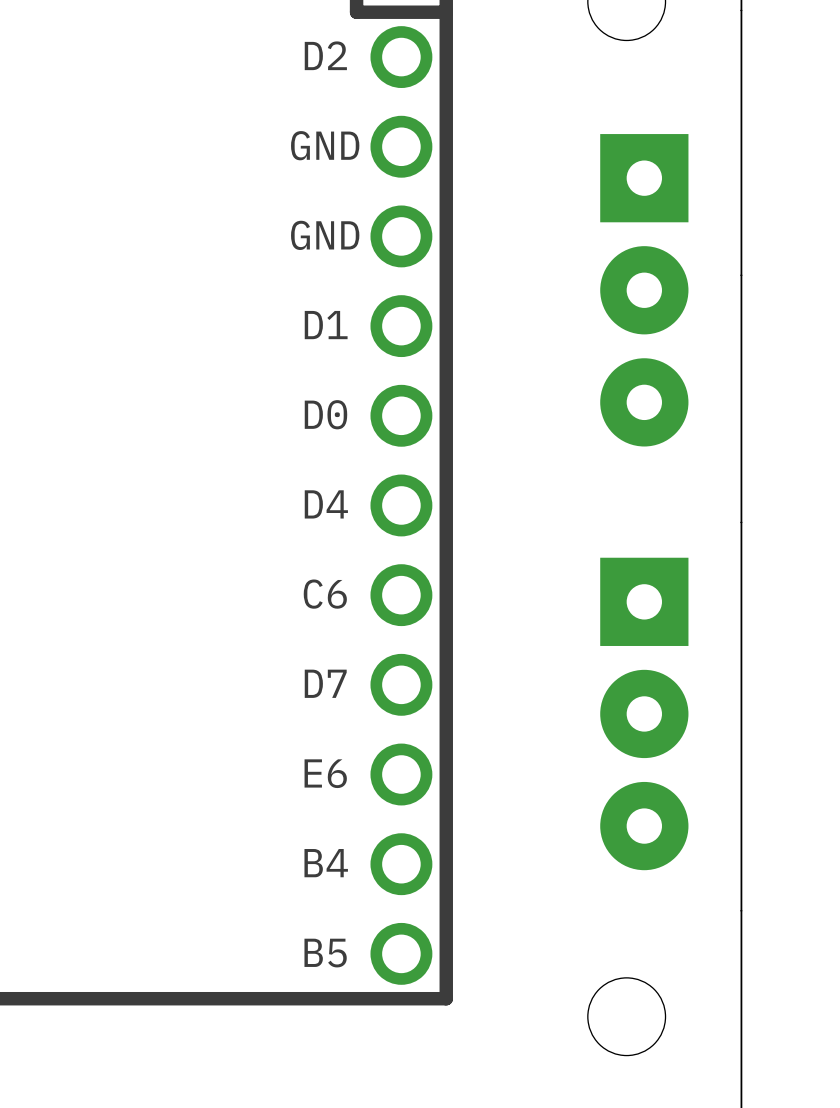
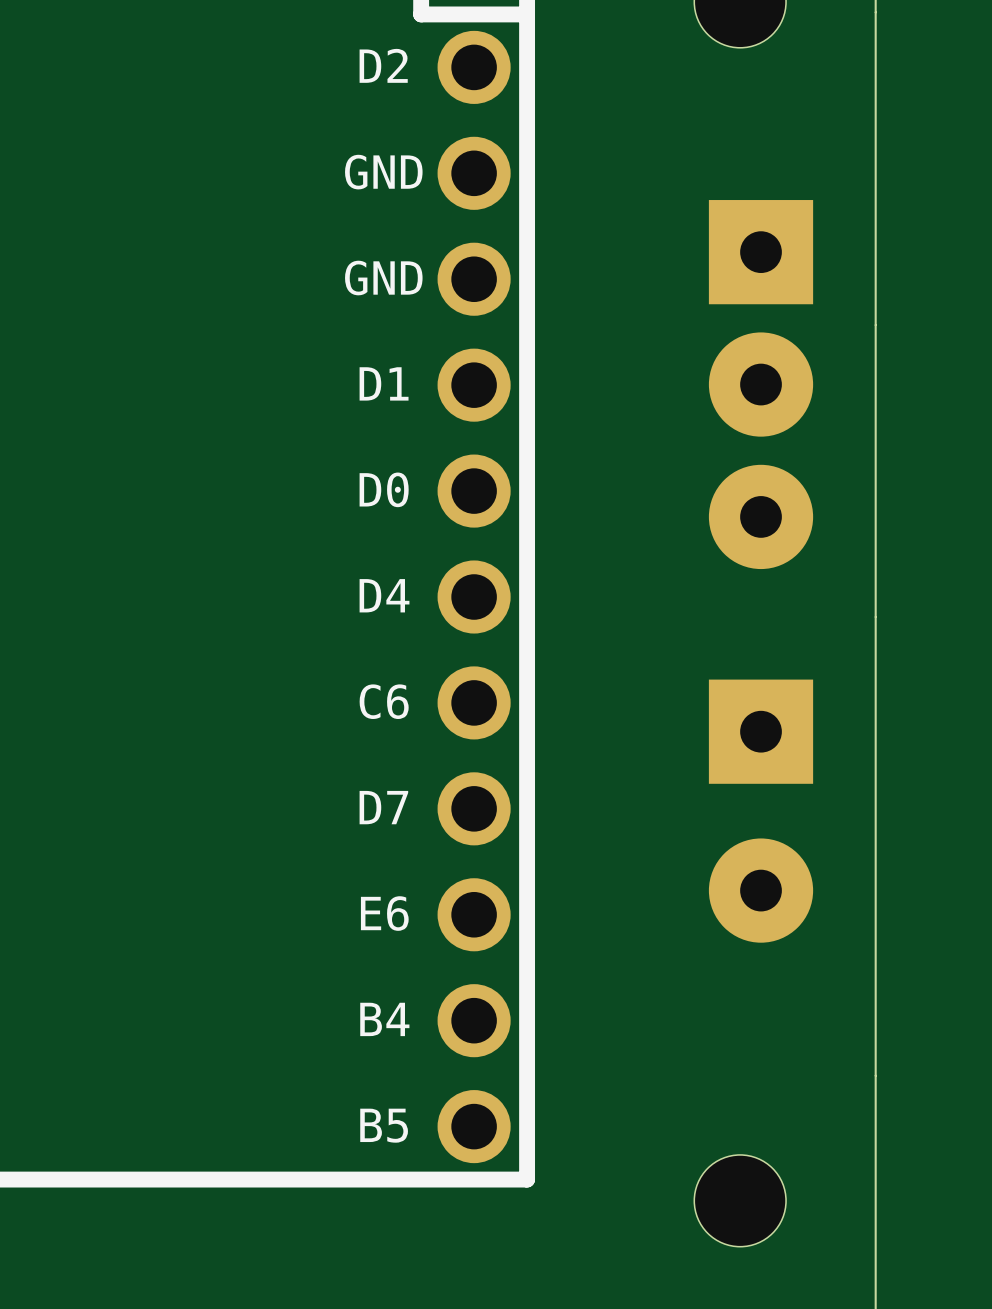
part position: (644, 290) -> (761, 384)
part footprint: [600, 557, 689, 871] -> [708, 679, 814, 943]

